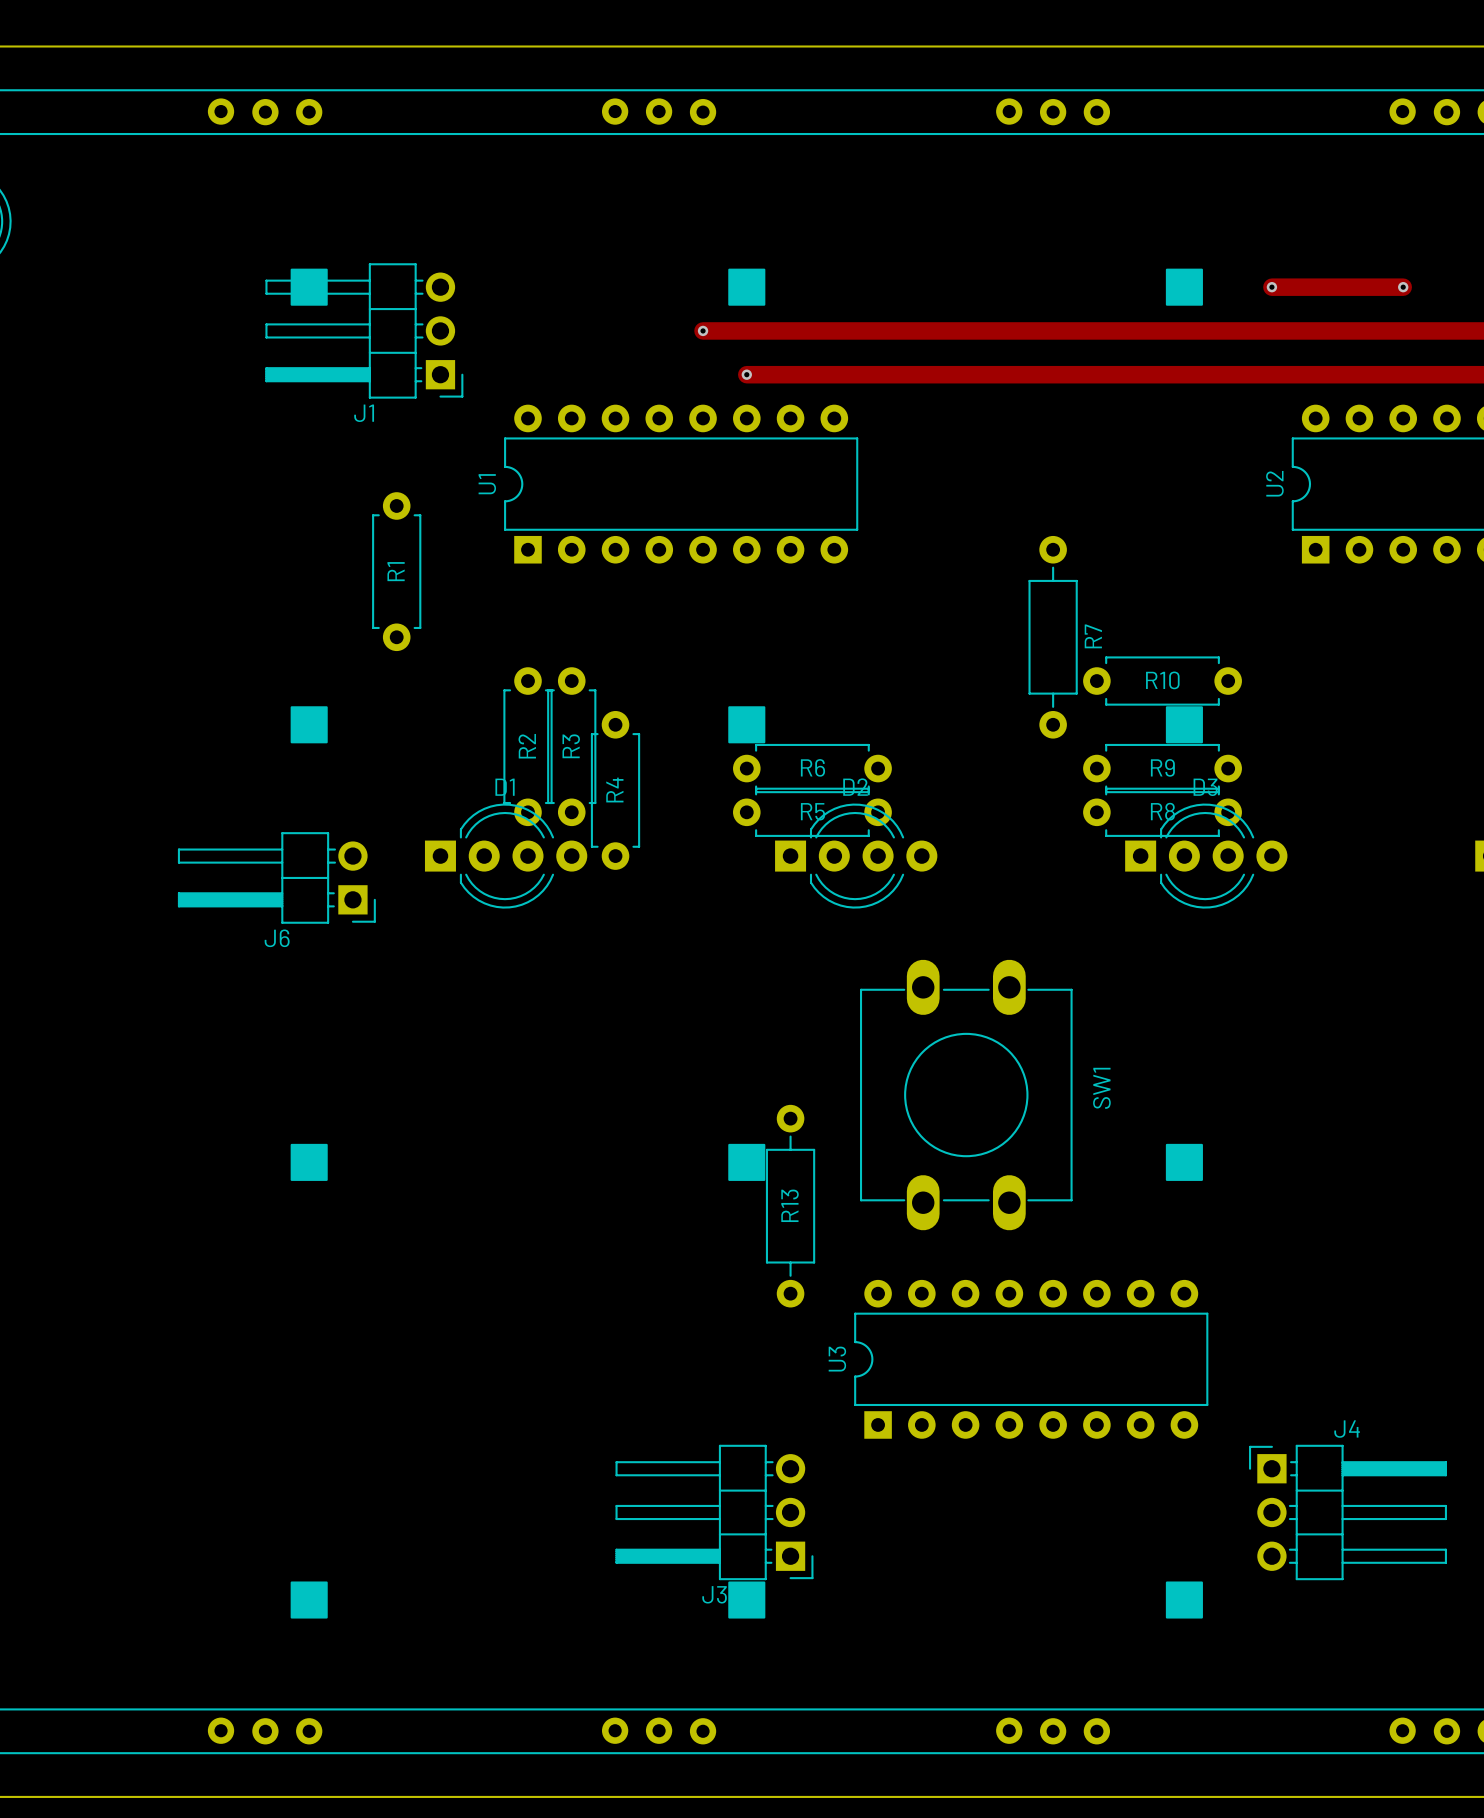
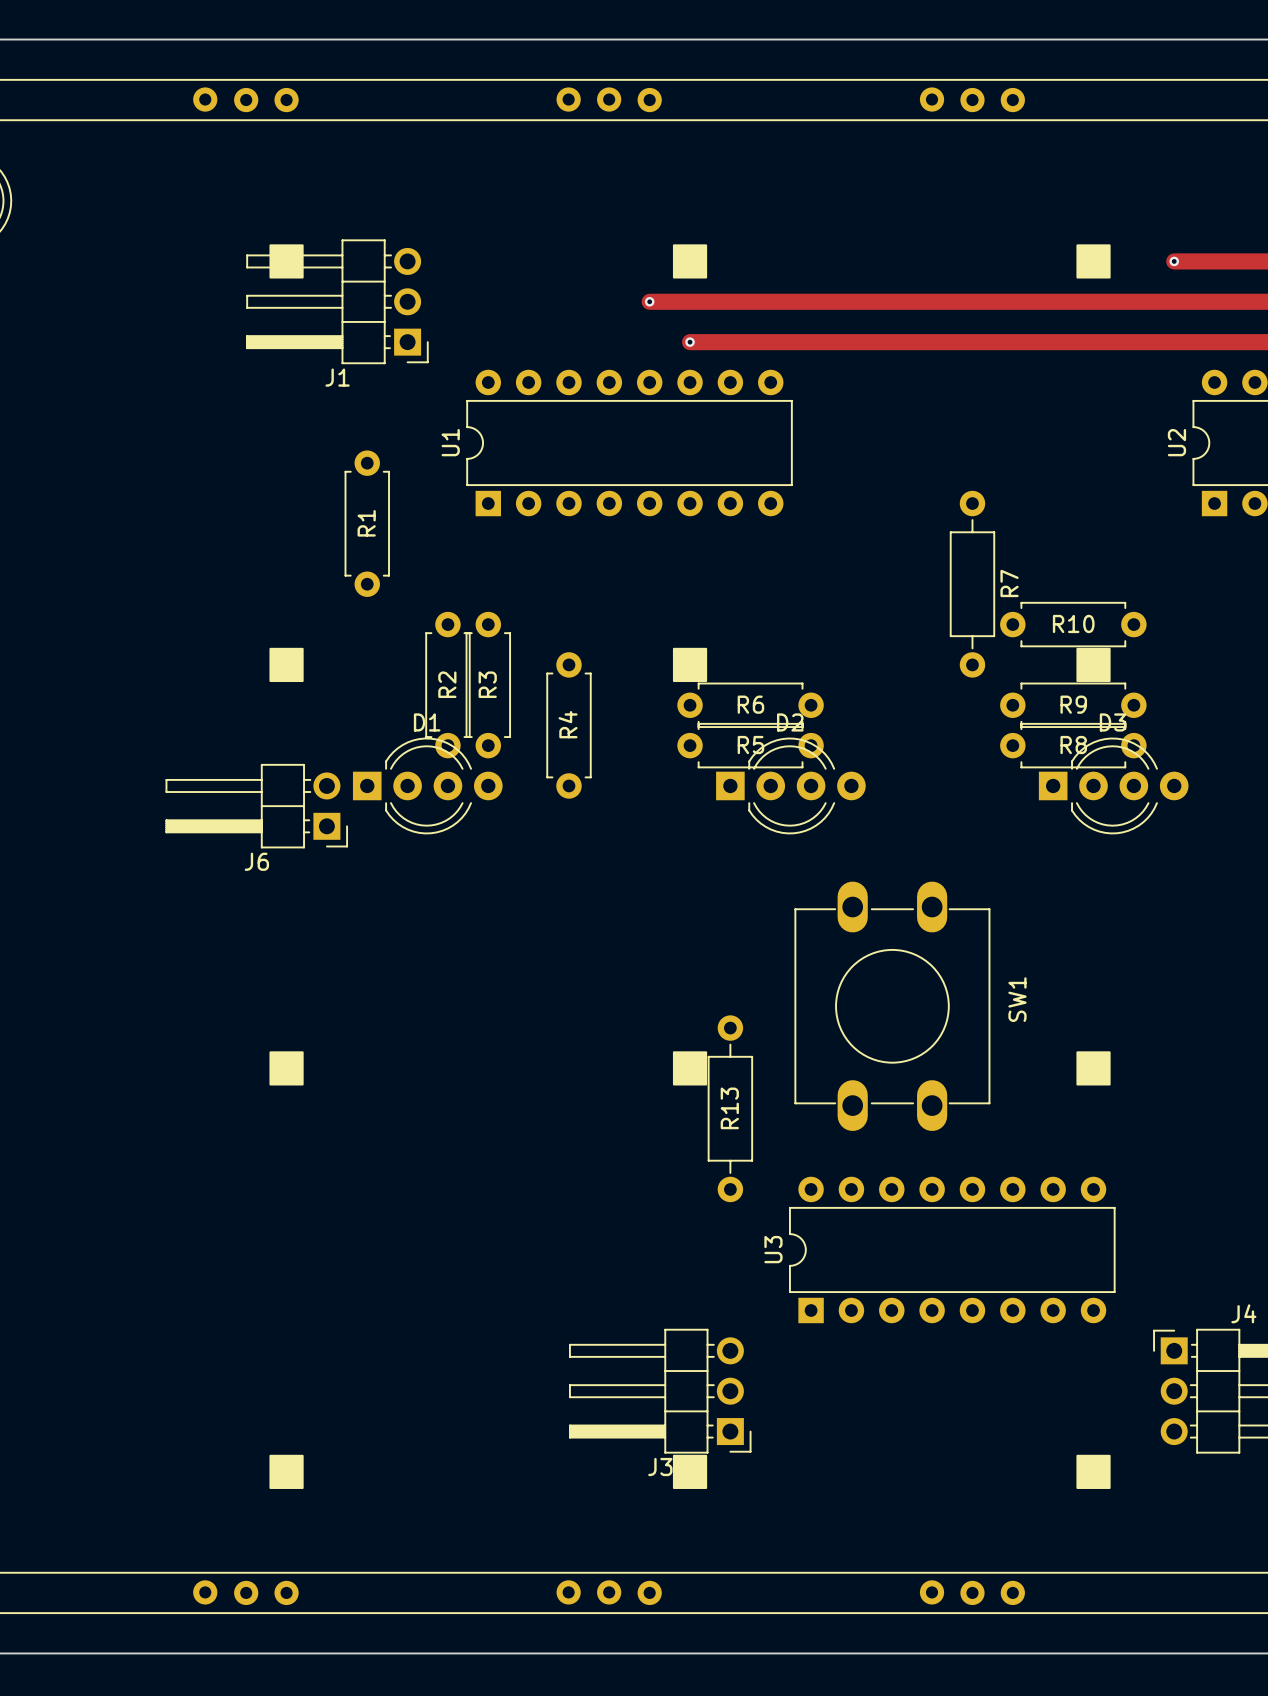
R2: none -> (447, 685)
R2 name: R2 (527, 746) -> R3 (487, 684)
R3: (571, 746) -> none
D1 position: (506, 856) -> (427, 785)

